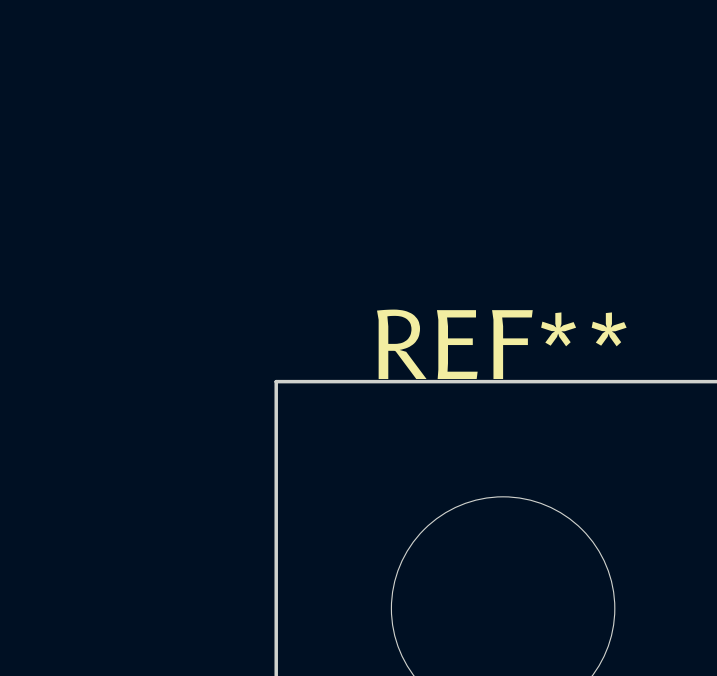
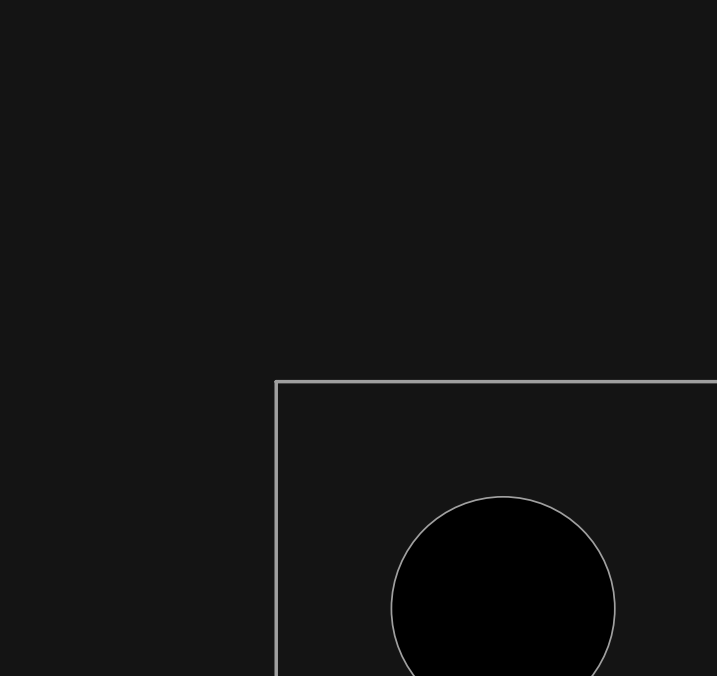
REF** name: REF** (501, 344) -> none

